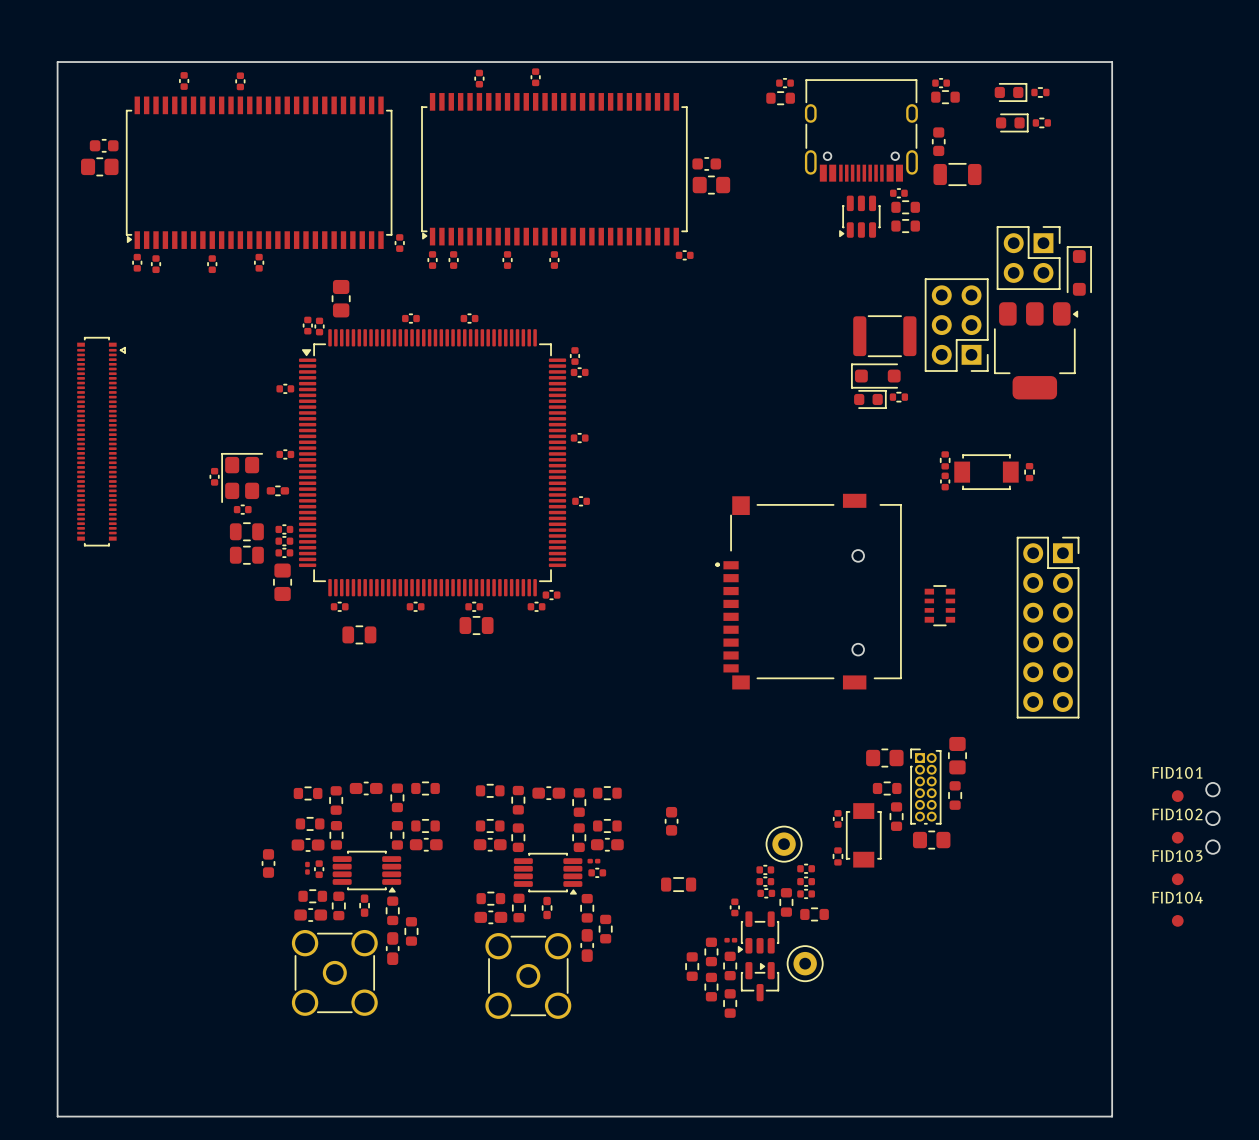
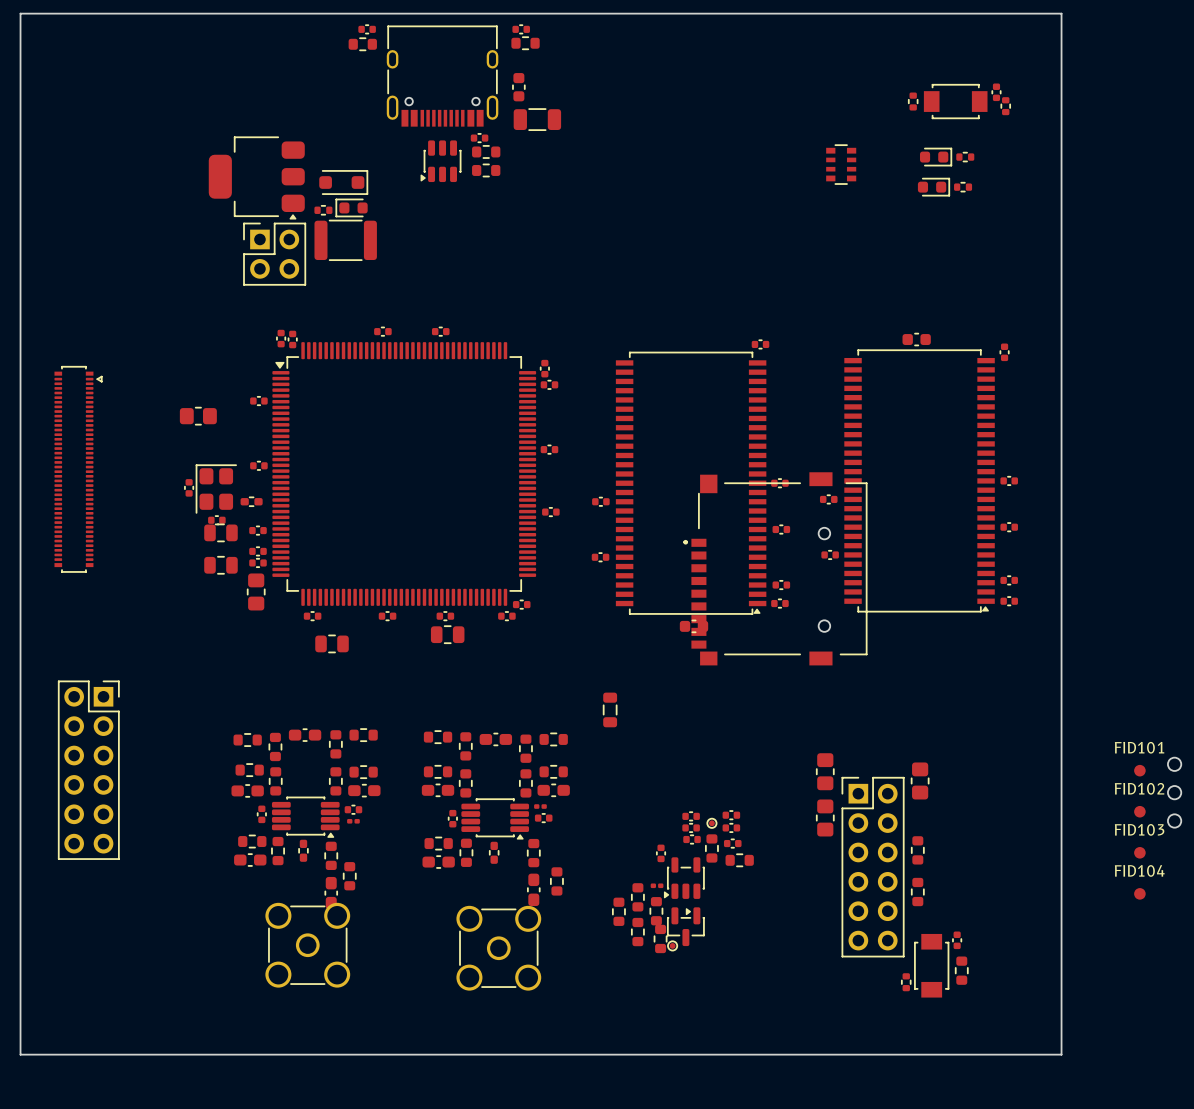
part: none -> (367, 29)
part: none -> (525, 43)
part: none -> (362, 44)
board edge: (57, 62) (1112, 62) (1112, 1116) (57, 1116) (57, 62) -> (20, 13) (1061, 13) (1061, 1054) (20, 1054) (20, 13)
part rotation: 0° (535, 77) -> 90° clockwise (521, 29)
part position: (535, 77) -> (521, 29)
part: (479, 78) -> none
part: (184, 80) -> none
part: (240, 81) -> none
part: (785, 83) -> none
part: (941, 83) -> none
part: none -> (442, 76)
part: (1010, 92) -> none
part: (1040, 92) -> none
part: (945, 97) -> none
part: (780, 98) -> none
part: none -> (518, 87)
part: none -> (996, 92)
part: none -> (913, 101)
part: none -> (955, 101)
part: (1012, 122) -> none
part rotation: 0° (1041, 122) -> 90° clockwise (1005, 106)
part: (861, 130) -> none
part: none -> (537, 119)
part: (938, 141) -> none
part: (104, 145) -> none
part: none -> (479, 138)
part: (706, 163) -> none
part: (99, 166) -> none
part: none -> (486, 151)
part: (554, 169) -> none
part: (259, 172) -> none
part: (957, 174) -> none
part: none -> (936, 157)
part: none -> (965, 157)
part: none -> (440, 161)
part: none -> (841, 164)
part: (711, 185) -> none
part: none -> (486, 170)
part: (898, 193) -> none
part: none -> (256, 178)
part: none -> (343, 182)
part: none -> (933, 187)
part: none -> (963, 187)
part: (905, 207) -> none
part: (859, 216) -> none
part: none -> (351, 207)
part: (905, 226) -> none
part: none -> (323, 210)
part: (399, 243) -> none
part: (684, 255) -> none
part: none -> (345, 240)
part: (1028, 258) -> none
part: (432, 260) -> none
part: (453, 260) -> none
part: (507, 260) -> none
part: (554, 260) -> none
part: (137, 262) -> none
part: (259, 262) -> none
part: (156, 264) -> none
part: (212, 264) -> none
part: (1079, 271) -> none
part: none -> (274, 254)
part: (341, 298) -> none
part position: (410, 318) -> (382, 331)
part position: (469, 318) -> (440, 331)
part: (307, 325) -> none
part: (956, 325) -> none
part: (319, 326) -> none
part: (884, 336) -> none
part: (1036, 350) -> none
part: (574, 356) -> none
part: none -> (281, 338)
part: none -> (292, 339)
part: none -> (916, 339)
part: none -> (760, 344)
part: (579, 372) -> none
part: none -> (1004, 352)
part: (875, 376) -> none
part: (285, 388) -> none
part: none -> (544, 368)
part: (898, 397) -> none
part: (870, 399) -> none
part: none -> (549, 384)
part: none -> (258, 401)
part: none -> (198, 416)
part: (579, 438) -> none
part position: (101, 441) -> (78, 469)
part: (285, 454) -> none
part: (945, 460) -> none
part position: (432, 462) -> (404, 473)
part: none -> (549, 449)
part: (986, 472) -> none
part: (1029, 472) -> none
part position: (214, 476) -> (189, 487)
part: (242, 477) -> none
part: (945, 481) -> none
part footprint: [266, 485, 290, 497] -> [250, 460, 268, 471]
part: (581, 501) -> none
part: none -> (919, 480)
part: none -> (1009, 480)
part footprint: [233, 504, 252, 515] -> [195, 464, 237, 514]
part: none -> (691, 483)
part: none -> (779, 483)
part: none -> (828, 499)
part: none -> (600, 501)
part footprint: [275, 524, 294, 535] -> [240, 496, 263, 507]
part position: (246, 531) -> (220, 565)
part: none -> (550, 512)
part footprint: [1016, 536, 1080, 719] -> [1000, 596, 1018, 607]
part: (284, 541) -> none
part: none -> (216, 520)
part: none -> (1009, 527)
part: none -> (781, 529)
part footprint: [273, 563, 292, 602] -> [249, 558, 267, 568]
part: none -> (257, 551)
part: none -> (830, 554)
part: none -> (600, 557)
part: (551, 595) -> none
part: none -> (1009, 580)
part: (939, 605) -> none
part: (339, 606) -> none
part position: (415, 606) -> (387, 616)
part position: (474, 606) -> (445, 616)
part: (536, 606) -> none
part: none -> (781, 585)
part: none -> (256, 591)
part position: (476, 625) -> (447, 634)
part: none -> (779, 603)
part: none -> (521, 604)
part position: (359, 634) -> (332, 643)
part: none -> (312, 616)
part: none -> (506, 616)
part: (957, 755) -> none
part: (884, 758) -> none
part: none -> (305, 735)
part: none -> (363, 735)
part: none -> (438, 737)
part: none -> (495, 739)
part: none -> (553, 739)
part: none -> (247, 740)
part: none -> (335, 744)
part: none -> (465, 746)
part: none -> (275, 746)
part: none -> (525, 748)
part footprint: [948, 781, 962, 810] -> [910, 762, 930, 800]
part: (925, 786) -> none
part: (366, 788) -> none
part: (425, 788) -> none
part: (887, 788) -> none
part: (490, 790) -> none
part: (308, 793) -> none
part: (548, 793) -> none
part: (607, 793) -> none
part: none -> (88, 770)
part: none -> (249, 770)
part rotation: 0° (397, 797) -> 90° clockwise (363, 772)
part: none -> (438, 771)
part: none -> (825, 771)
part: (336, 800) -> none
part: (518, 800) -> none
part rotation: 0° (579, 802) -> 90° clockwise (553, 771)
part footprint: [846, 803, 882, 868] -> [816, 799, 835, 837]
part: none -> (275, 781)
part: none -> (335, 781)
part: none -> (465, 783)
part: none -> (525, 783)
part: none -> (247, 790)
part: none -> (364, 790)
part: none -> (438, 790)
part: none -> (553, 790)
part: (896, 816) -> none
part: (837, 818) -> none
part footprint: [329, 821, 344, 850] -> [271, 796, 340, 838]
part rotation: 0° (671, 821) -> 90° clockwise (694, 626)
part position: (671, 821) -> (694, 626)
part: (310, 823) -> none
part footprint: [511, 823, 526, 853] -> [461, 798, 530, 840]
part: (425, 825) -> none
part: (490, 825) -> none
part: (607, 825) -> none
part: none -> (353, 809)
part: (397, 835) -> none
part: (579, 837) -> none
part footprint: [473, 838, 507, 852] -> [447, 809, 458, 828]
part: none -> (261, 814)
part: (931, 840) -> none
part: none -> (731, 815)
part: none -> (691, 816)
part: (426, 844) -> none
part: (607, 844) -> none
part: (784, 844) -> none
part: (308, 845) -> none
part footprint: [261, 849, 276, 878] -> [238, 834, 267, 849]
part: none -> (711, 823)
part: none -> (691, 827)
part: none -> (731, 827)
part position: (837, 856) -> (906, 982)
part position: (593, 861) -> (540, 806)
part: none -> (692, 839)
part rotation: 0° (307, 868) -> 90° clockwise (353, 821)
part position: (307, 868) -> (353, 821)
part: (806, 868) -> none
part: (319, 869) -> none
part: none -> (438, 843)
part: (366, 871) -> none
part position: (597, 872) -> (543, 818)
part: (548, 873) -> none
part: none -> (711, 848)
part: none -> (917, 850)
part: none -> (466, 852)
part: none -> (533, 853)
part: none -> (661, 853)
part: (765, 881) -> none
part: (806, 881) -> none
part: none -> (331, 855)
part rotation: 0° (678, 884) -> 90° clockwise (610, 709)
part position: (678, 884) -> (610, 709)
part: none -> (250, 860)
part: none -> (438, 862)
part: (766, 893) -> none
part: (806, 893) -> none
part: none -> (873, 867)
part rotation: 0° (312, 896) -> 90° clockwise (278, 851)
part position: (312, 896) -> (278, 851)
part: (490, 898) -> none
part rotation: 0° (786, 902) -> 90° clockwise (739, 860)
part position: (786, 902) -> (739, 860)
part: (338, 905) -> none
part position: (364, 905) -> (303, 850)
part: (734, 907) -> none
part: (518, 908) -> none
part position: (547, 908) -> (494, 852)
part position: (392, 910) -> (349, 876)
part: (814, 914) -> none
part: (310, 915) -> none
part: none -> (533, 889)
part: (490, 917) -> none
part: none -> (917, 892)
part: none -> (331, 893)
part: none -> (637, 897)
part: (605, 929) -> none
part: (411, 931) -> none
part position: (758, 932) -> (684, 878)
part footprint: [704, 937, 719, 967] -> [667, 907, 705, 947]
part: none -> (656, 911)
part: none -> (618, 911)
part position: (730, 940) -> (657, 885)
part: (587, 945) -> none
part: (392, 948) -> none
part: none -> (637, 932)
part: (805, 963) -> none
part: (730, 966) -> none
part: none -> (957, 940)
part: none -> (672, 945)
part: (760, 981) -> none
part: (711, 987) -> none
part: none -> (931, 965)
part: none -> (961, 970)
part: (730, 1003) -> none

